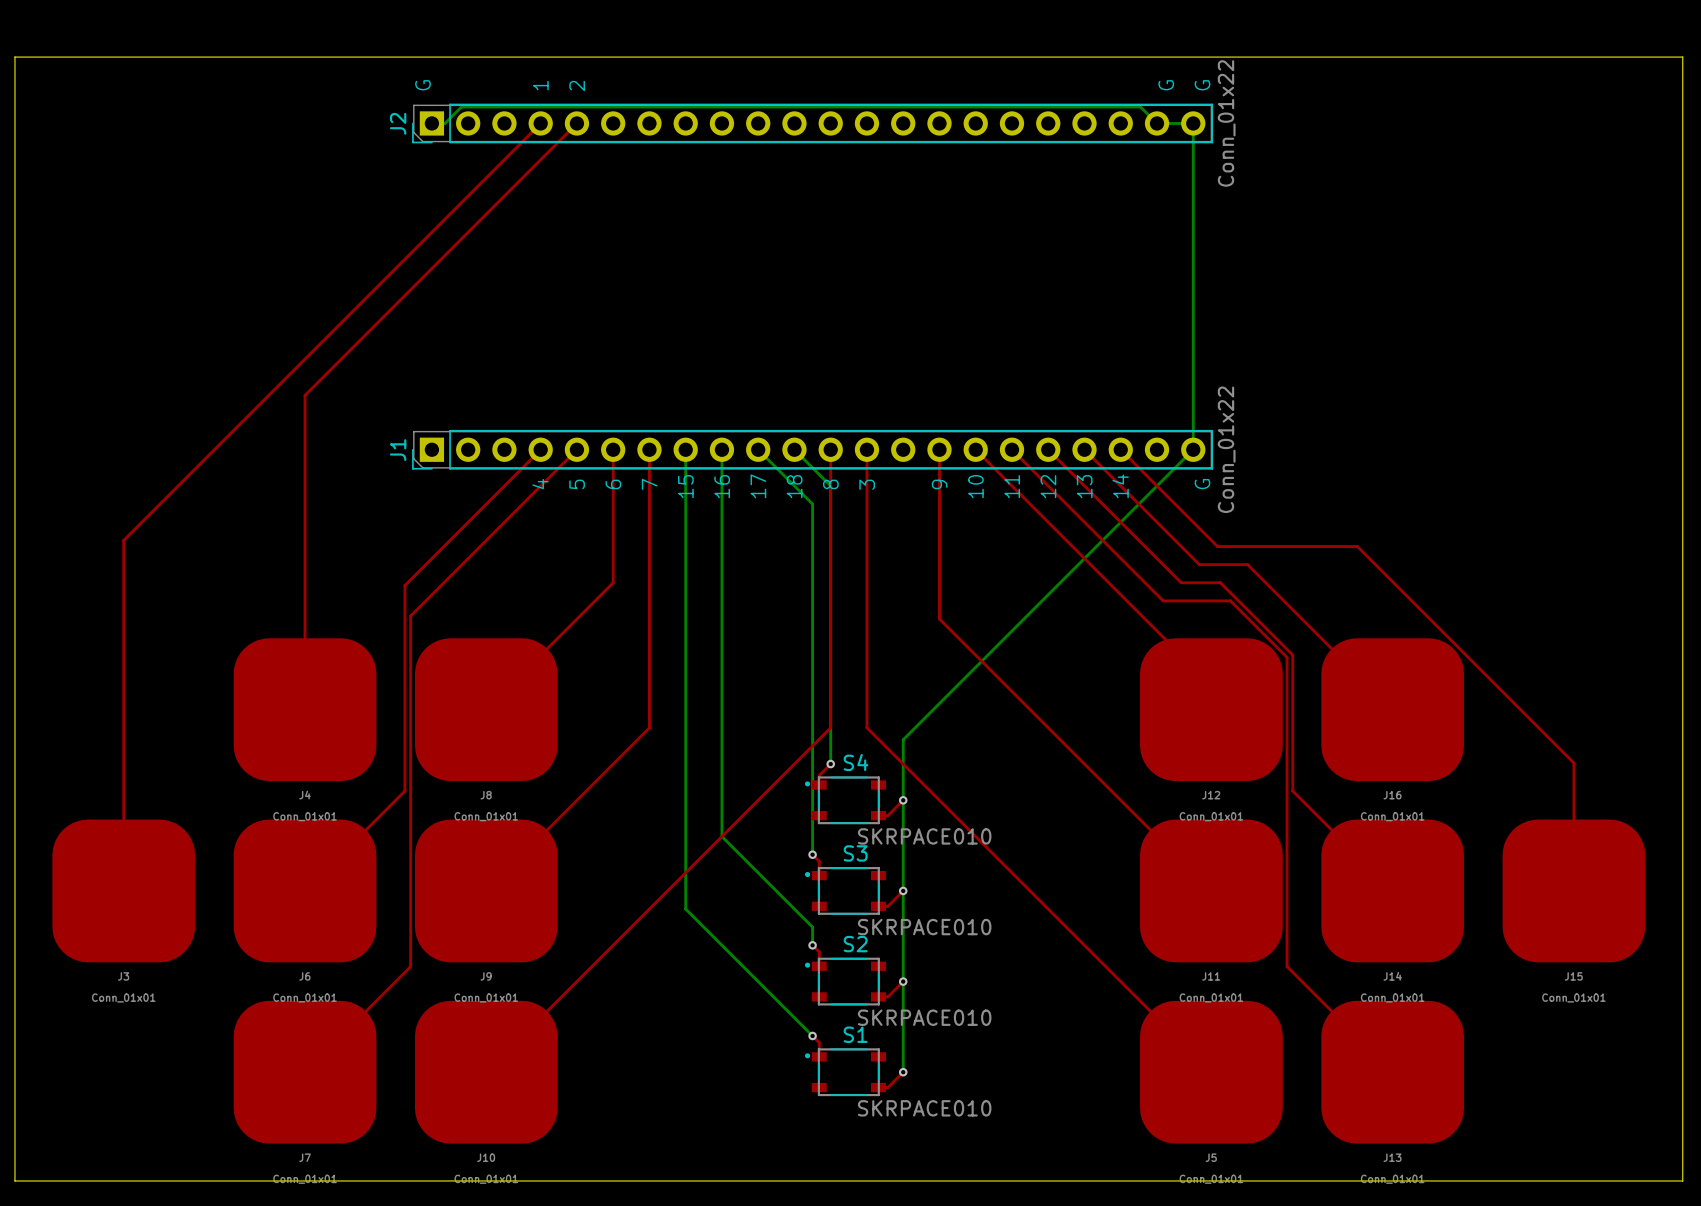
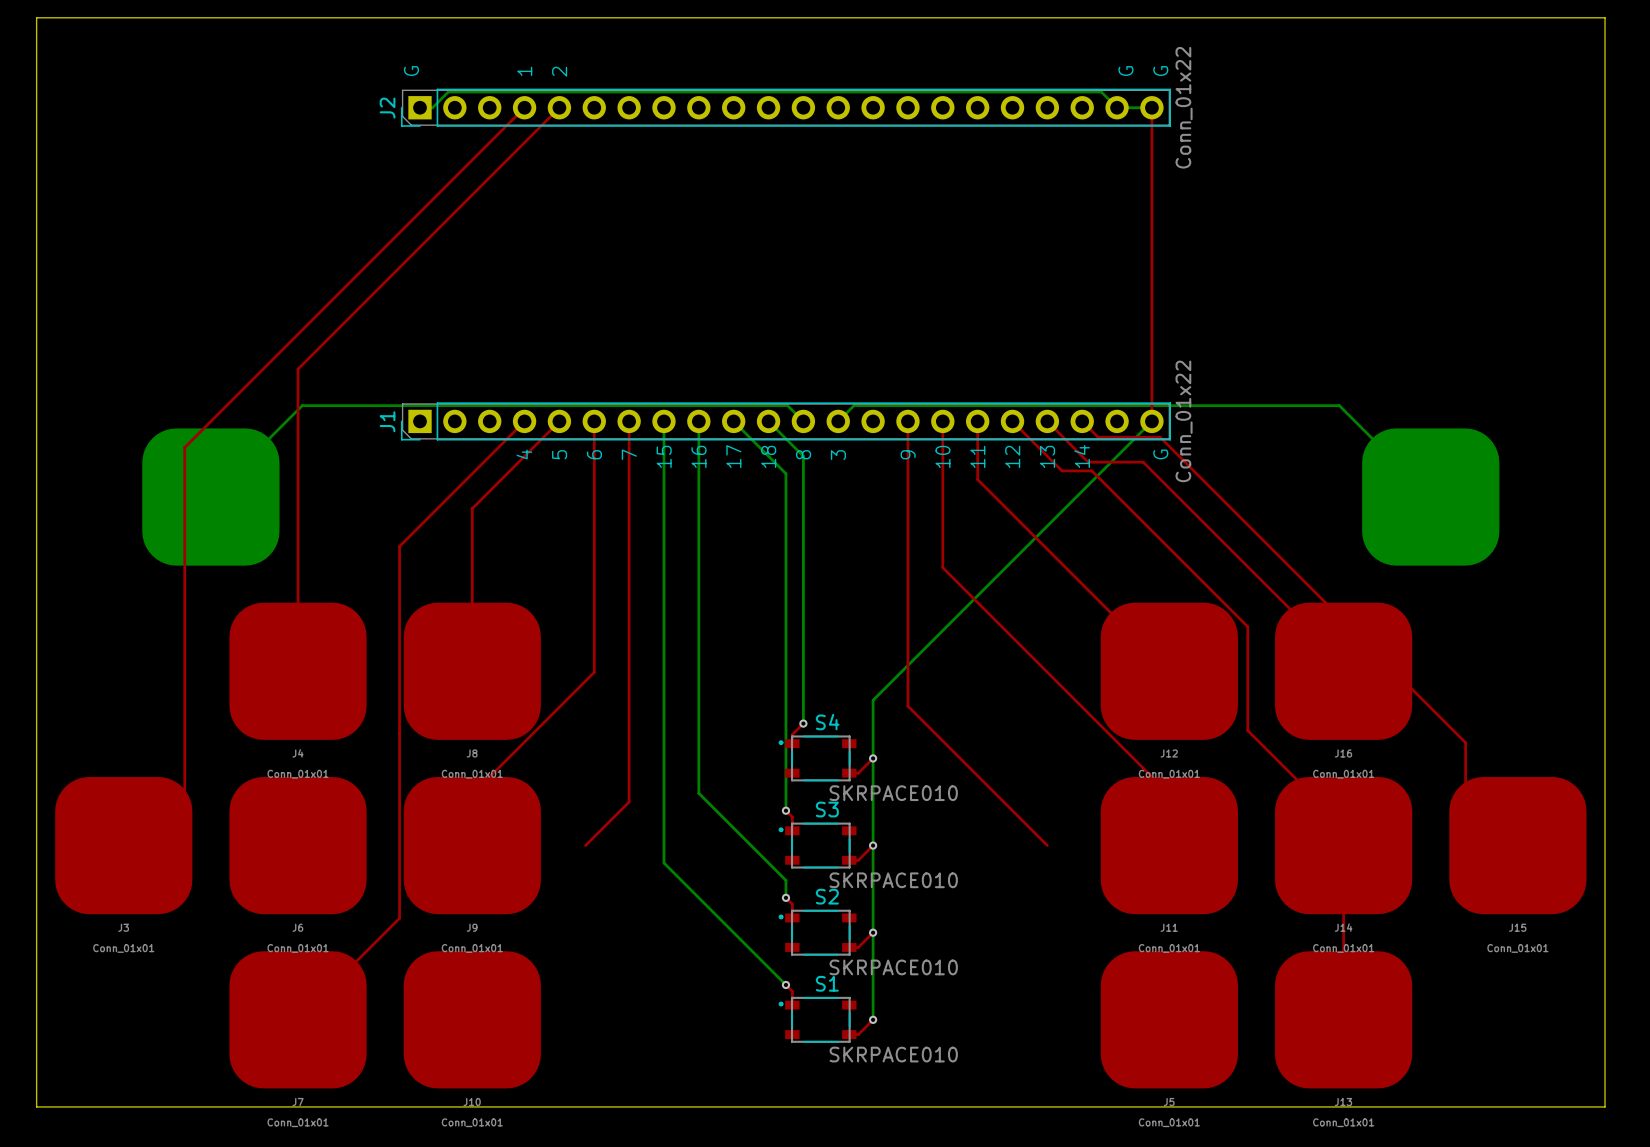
board edge: (14, 57) (1682, 57) (1682, 1180) (14, 1180) (14, 57) -> (36, 17) (36, 1106) (1605, 1106) (1605, 17) (36, 17)
top track: none -> (1151, 107) (1151, 421)
bottom track: (1193, 123) (1193, 449) -> none
top track: (830, 449) (830, 727) (486, 1072) -> none
bottom track: none -> (803, 421) (787, 405) (302, 405) (210, 497)
top track: (866, 449) (866, 727) (1211, 1072) -> none
bottom track: none -> (838, 421) (854, 405) (1339, 405) (1430, 497)
top track: (975, 449) (1211, 685) (1211, 709) -> (977, 421) (977, 479) (1169, 671)
top track: none -> (942, 421) (942, 567) (1221, 845)
top track: (1011, 449) (1163, 600) (1230, 600) -> (1061, 470) (1091, 470) (1187, 566)
top track: (1137, 466) (1217, 546) (1357, 546) (1573, 763) (1573, 890) -> (1098, 437) (1160, 437) (1465, 742) (1465, 845)
top track: (187, 476) (123, 540) (123, 890) -> (184, 447) (184, 845)
top track: (1126, 492) (1199, 564) (1247, 564) (1392, 709) -> (1088, 462) (1143, 462) (1343, 662) (1343, 723)
top track: (1099, 501) (1181, 582) (1220, 582) (1292, 655) (1292, 791) (1392, 890) -> none
part: none -> (210, 497)
part: none -> (1430, 497)
top track: (486, 540) (410, 616) -> (399, 546) (399, 581)
top track: (410, 579) (404, 585) (404, 791) (305, 890) -> none
top track: (613, 582) (486, 709) -> (472, 508) (472, 671)
top track: none -> (594, 549) (594, 672) (420, 845)
top track: (939, 619) (1211, 890) -> (907, 584) (907, 706) (1047, 845)
top track: (1287, 657) (1287, 966) (1392, 1072) -> (1242, 621) (1247, 626) (1247, 730) (1343, 826) (1343, 967)
top track: (649, 727) (486, 890) -> (629, 688) (629, 802) (585, 845)

